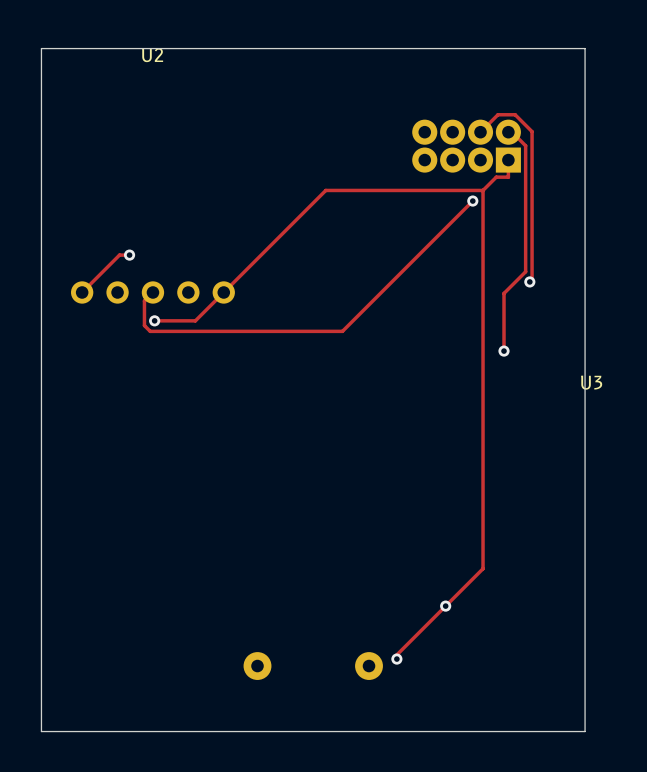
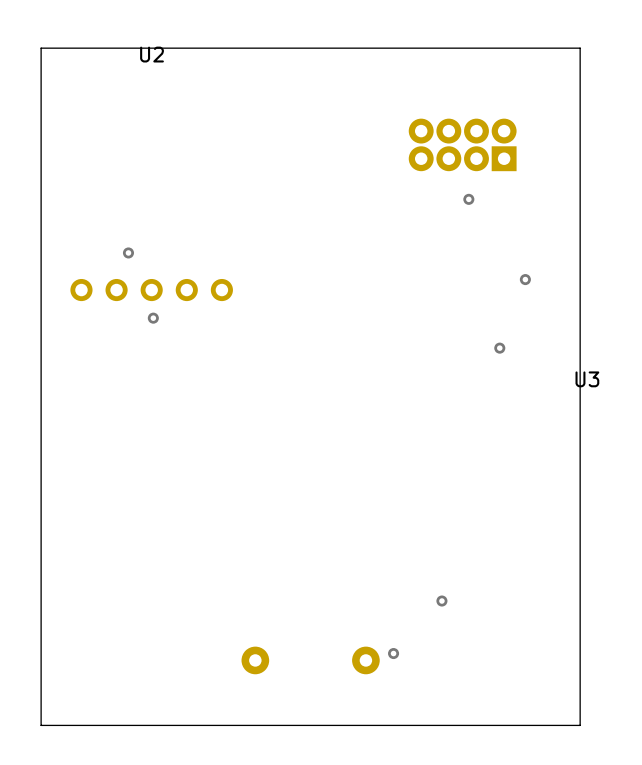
track: (480, 132) (497, 114) (515, 114) (532, 131) (532, 279) (529, 281) -> none
track: (508, 132) (512, 132) (525, 145) (525, 271) (504, 293) (504, 351) -> none
track: (508, 160) (508, 177) (496, 177) (483, 190) -> none
track: (483, 190) (325, 190) (195, 320) (154, 320) -> none
track: (483, 190) (483, 568) (396, 654) (396, 659) -> none
track: (472, 201) (342, 331) (150, 331) (144, 325) (144, 300) (152, 292) -> none
track: (129, 255) (119, 255) (82, 292) -> none

